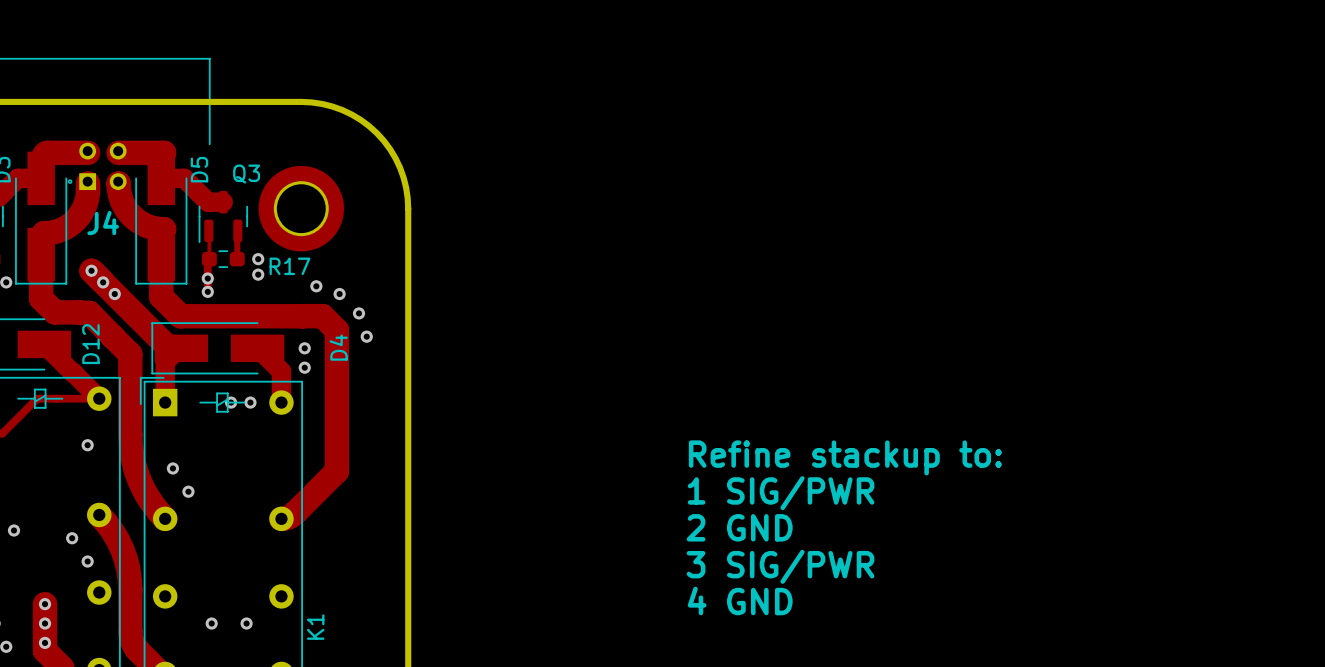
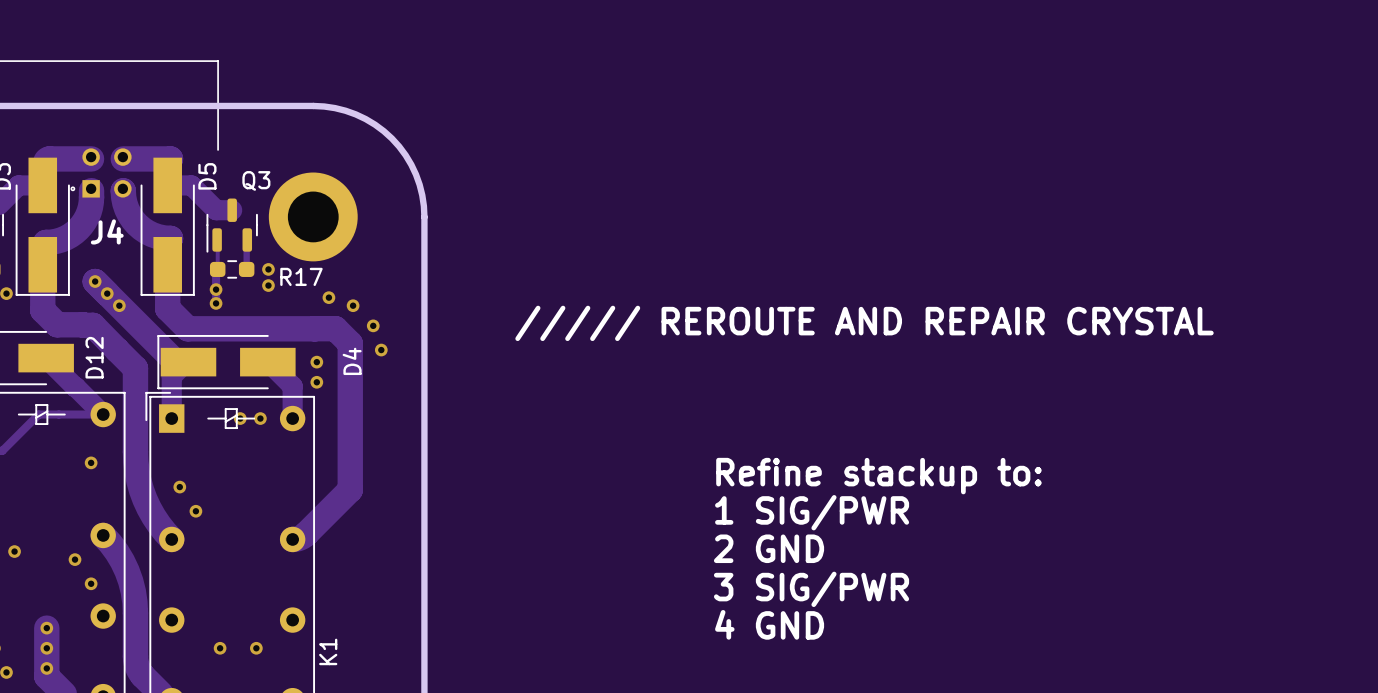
text: none -> ///// REROUTE AND REPAIR CRYSTAL (864, 323)

